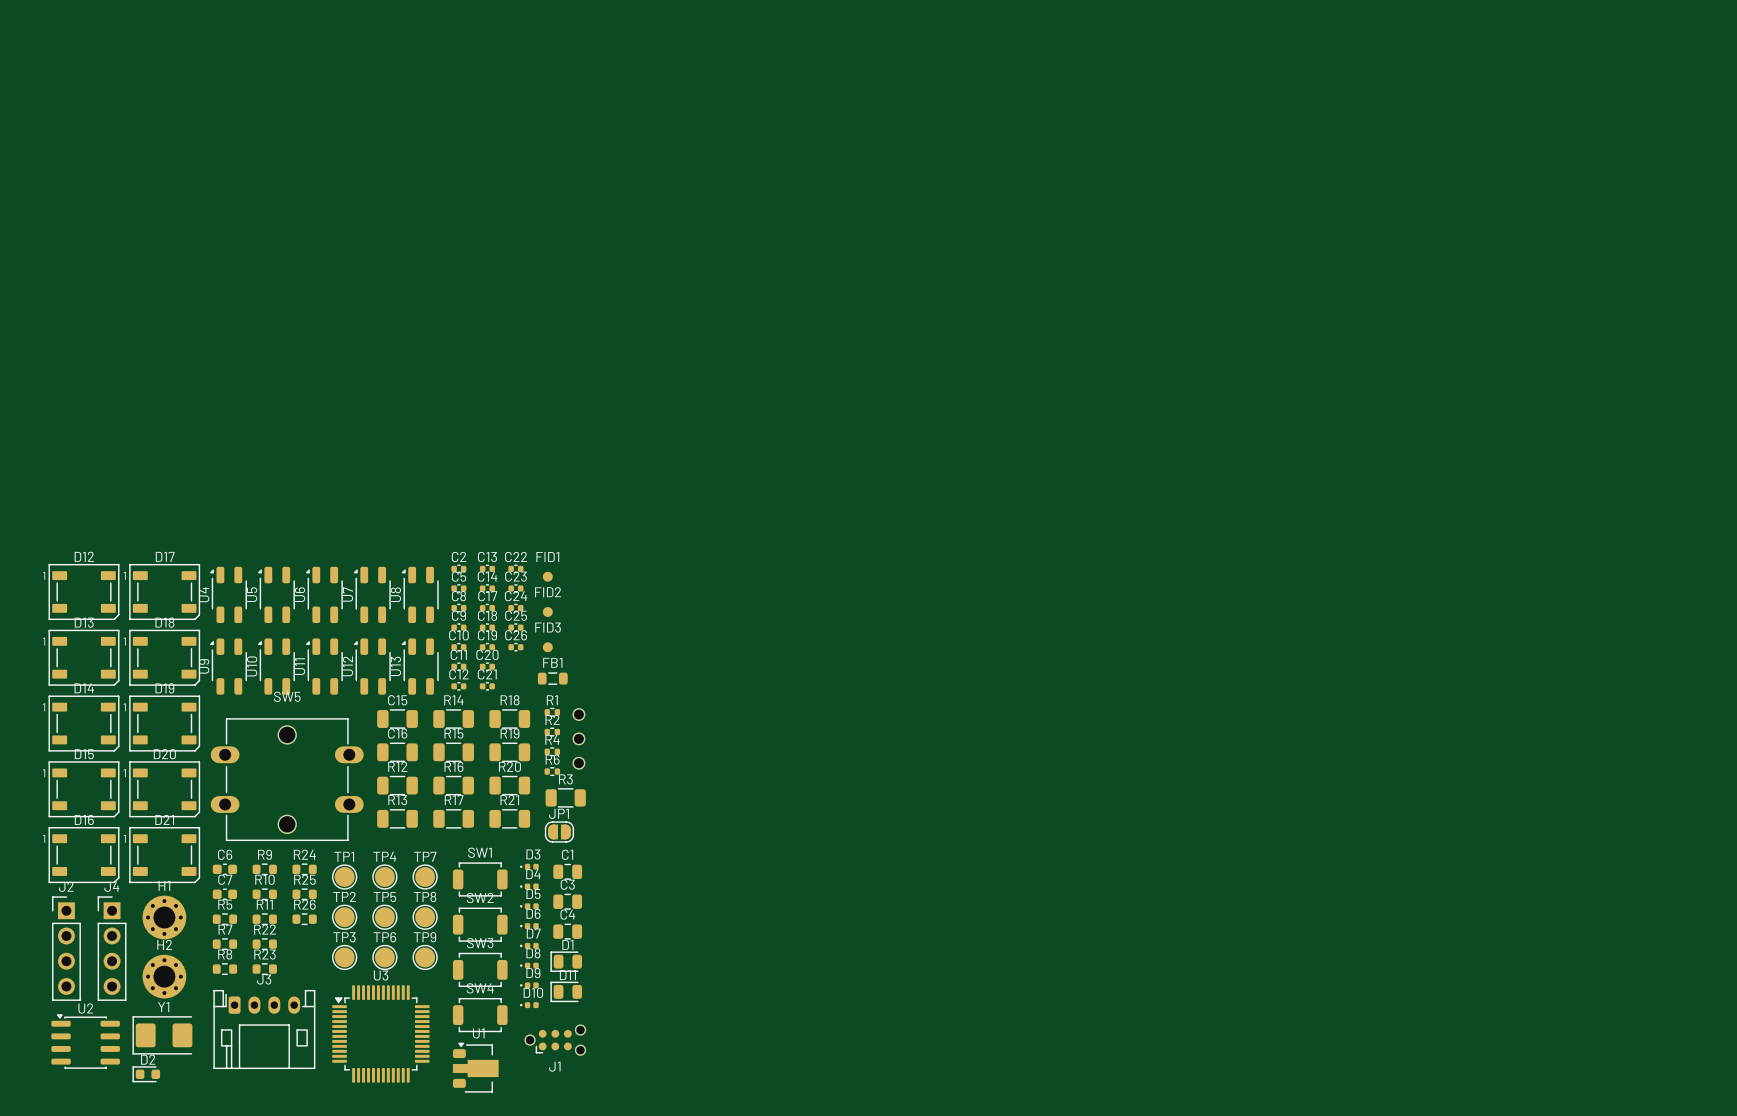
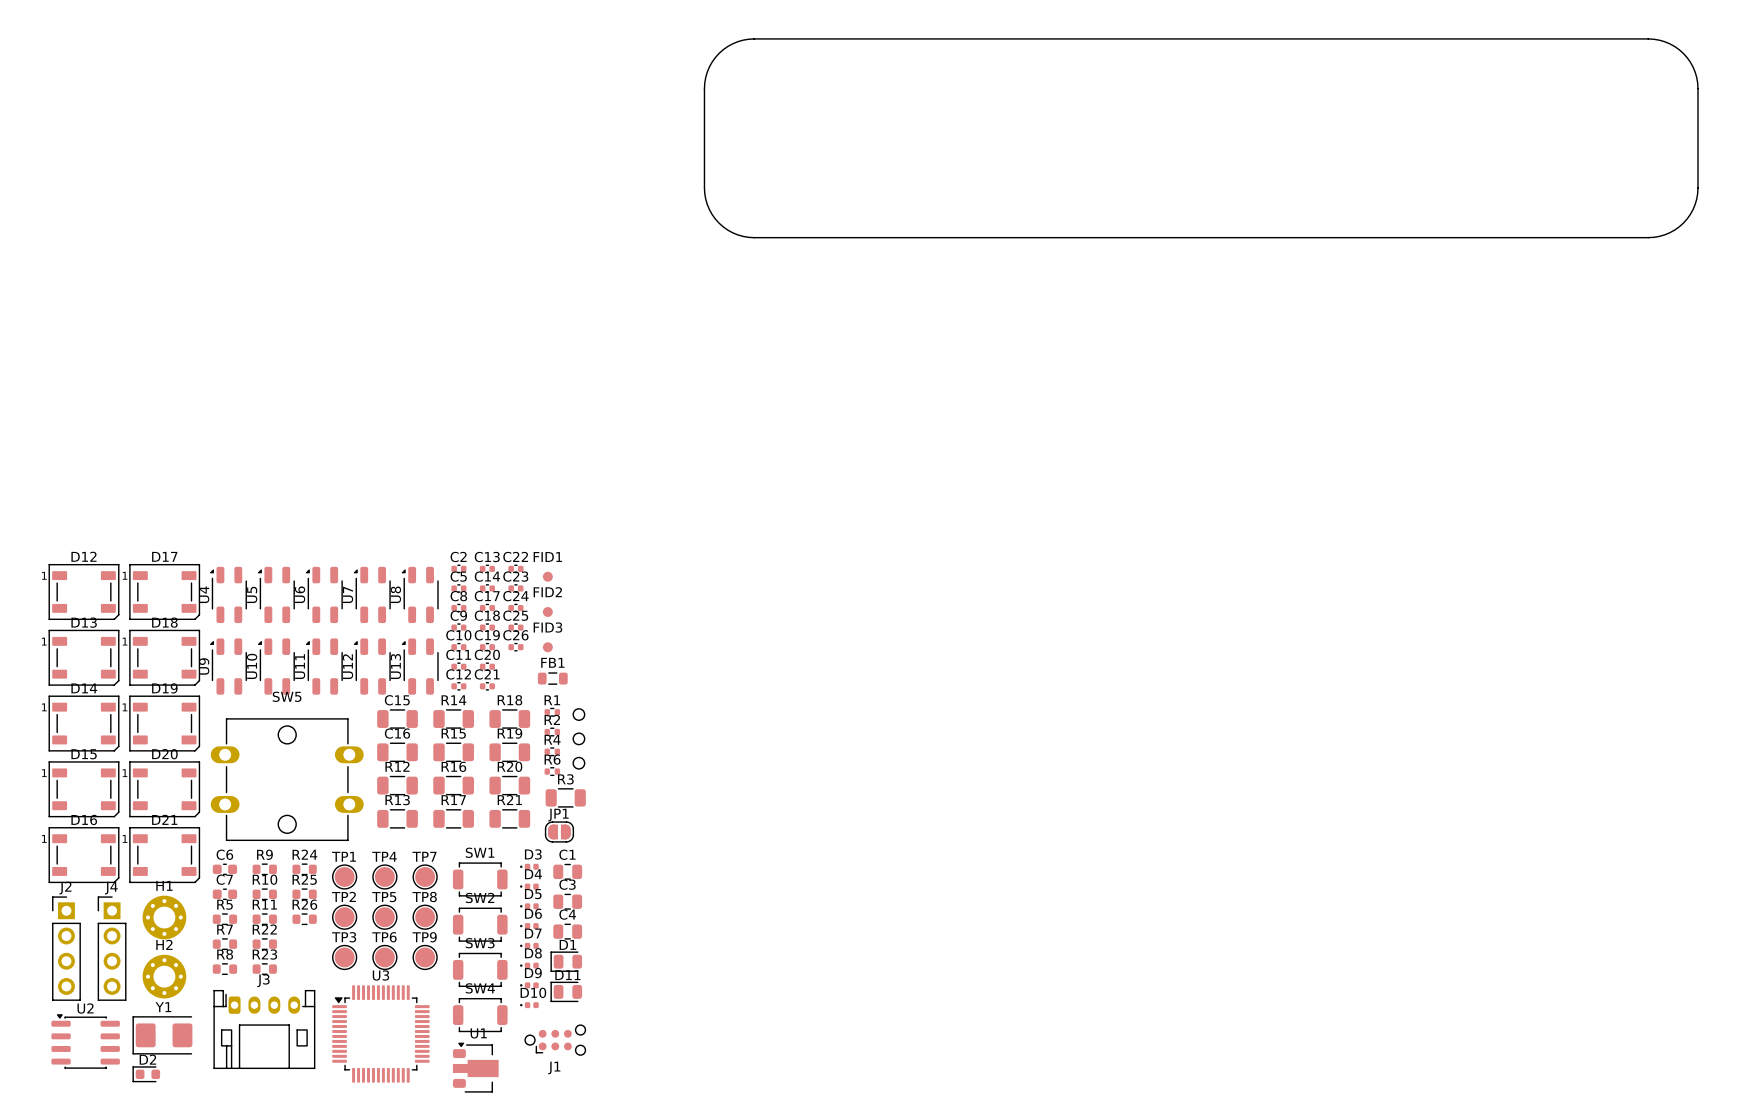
board edge: none -> (754, 38) (1653, 39) (1669, 43) (1683, 53) (1693, 67) (1696, 77) (1697, 193) (1693, 209) (1683, 223) (1669, 232) (1648, 237) (748, 237) (732, 232) (723, 226) (712, 214) (707, 204) (704, 187) (704, 88) (707, 72) (719, 53) (732, 43) (754, 38)

